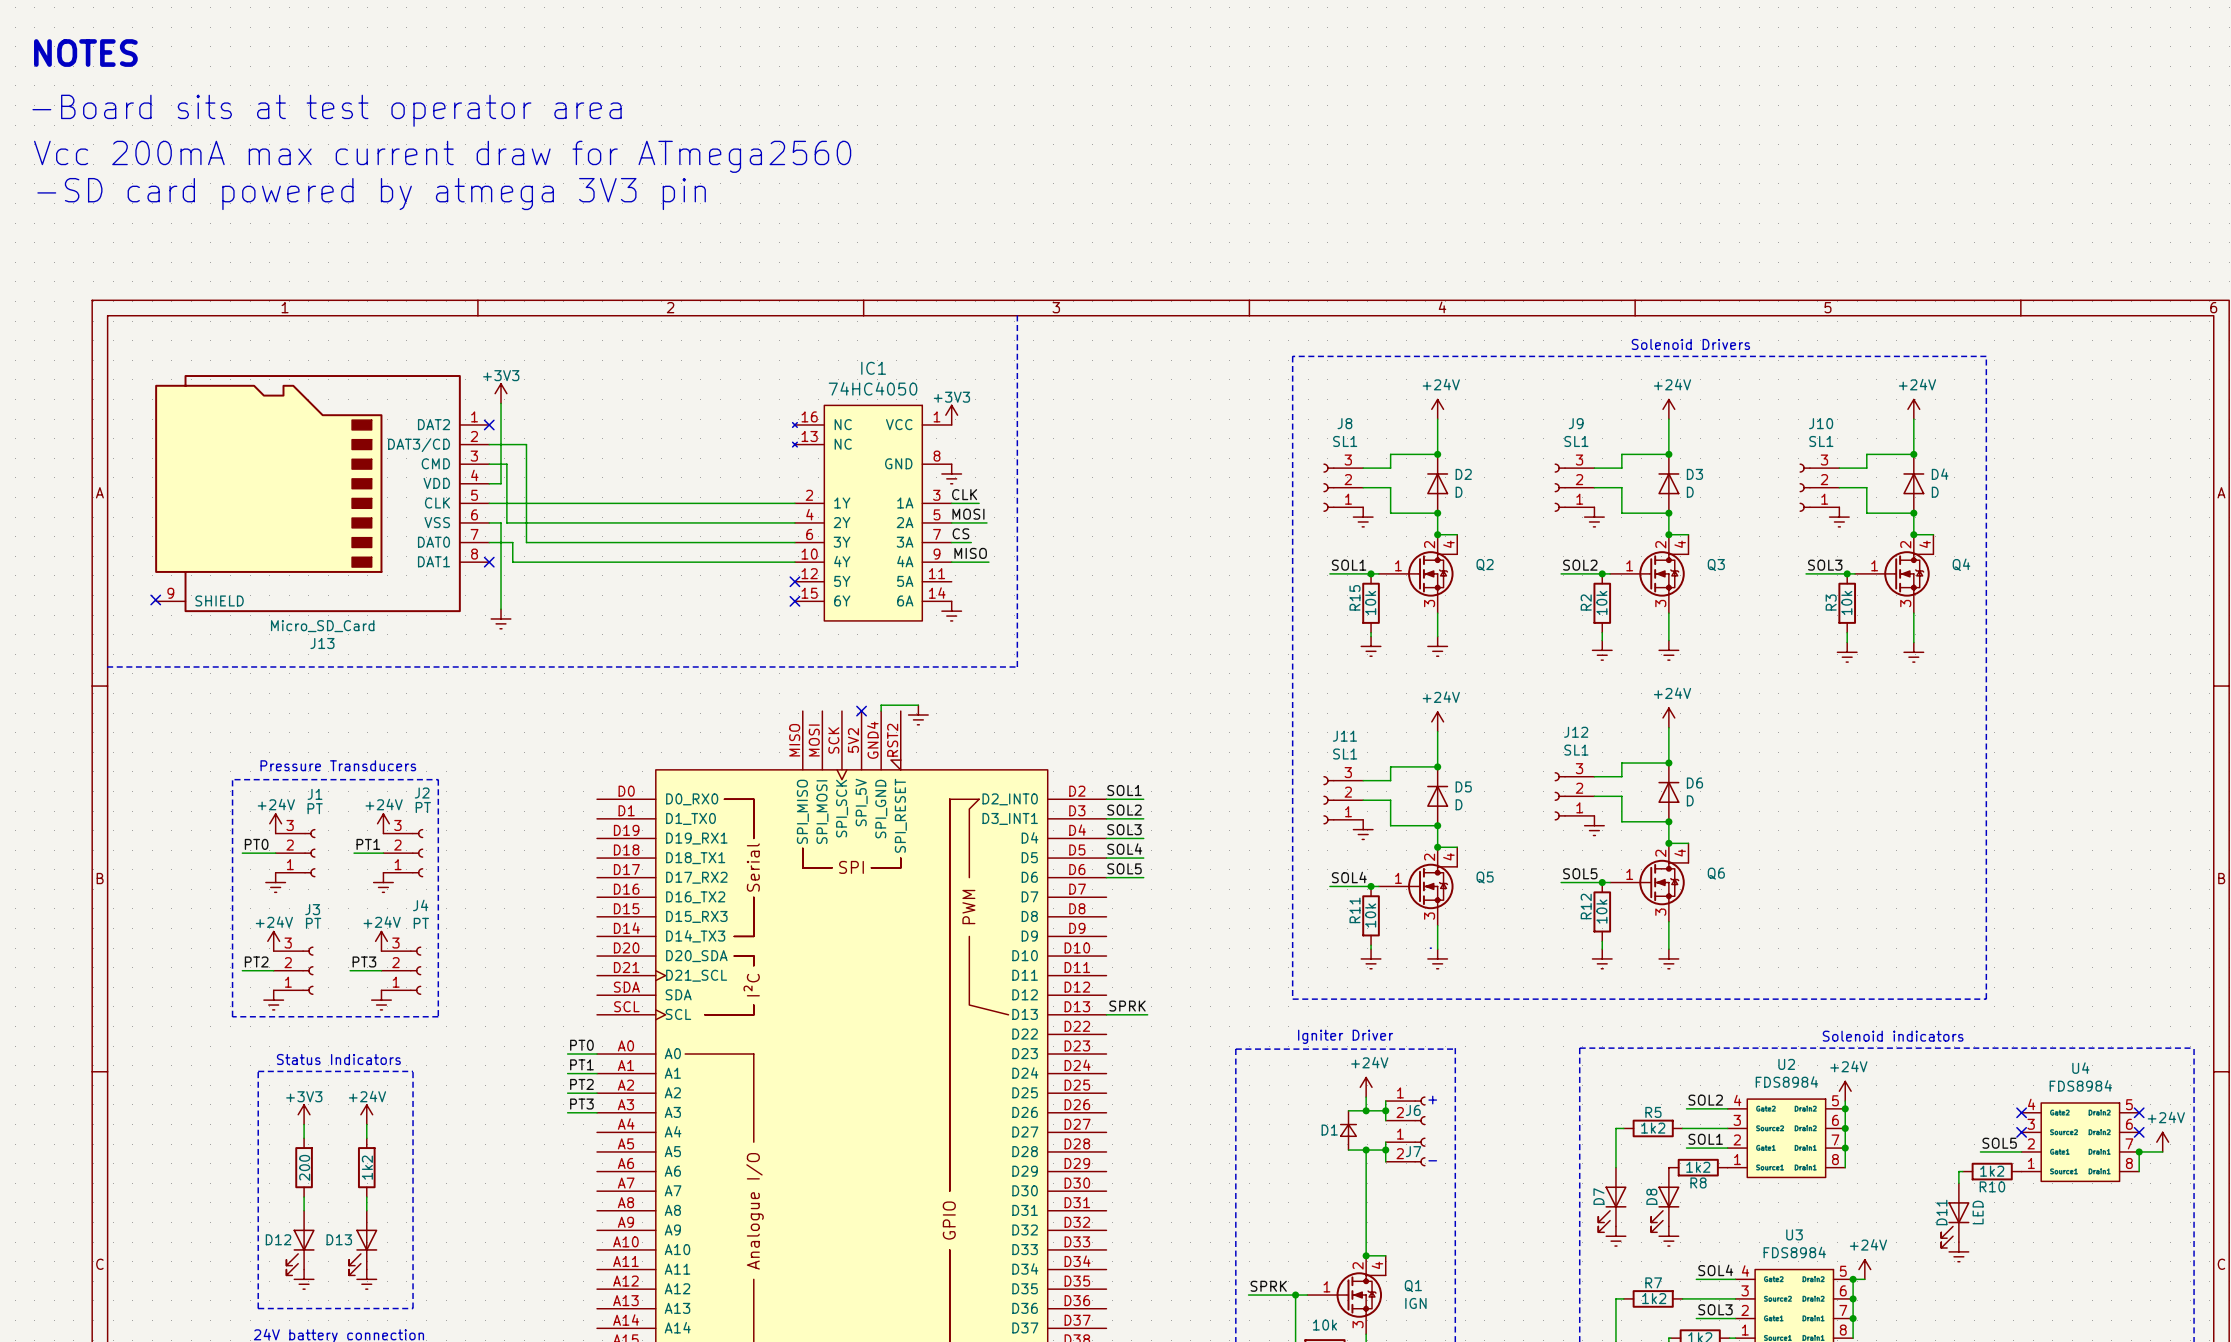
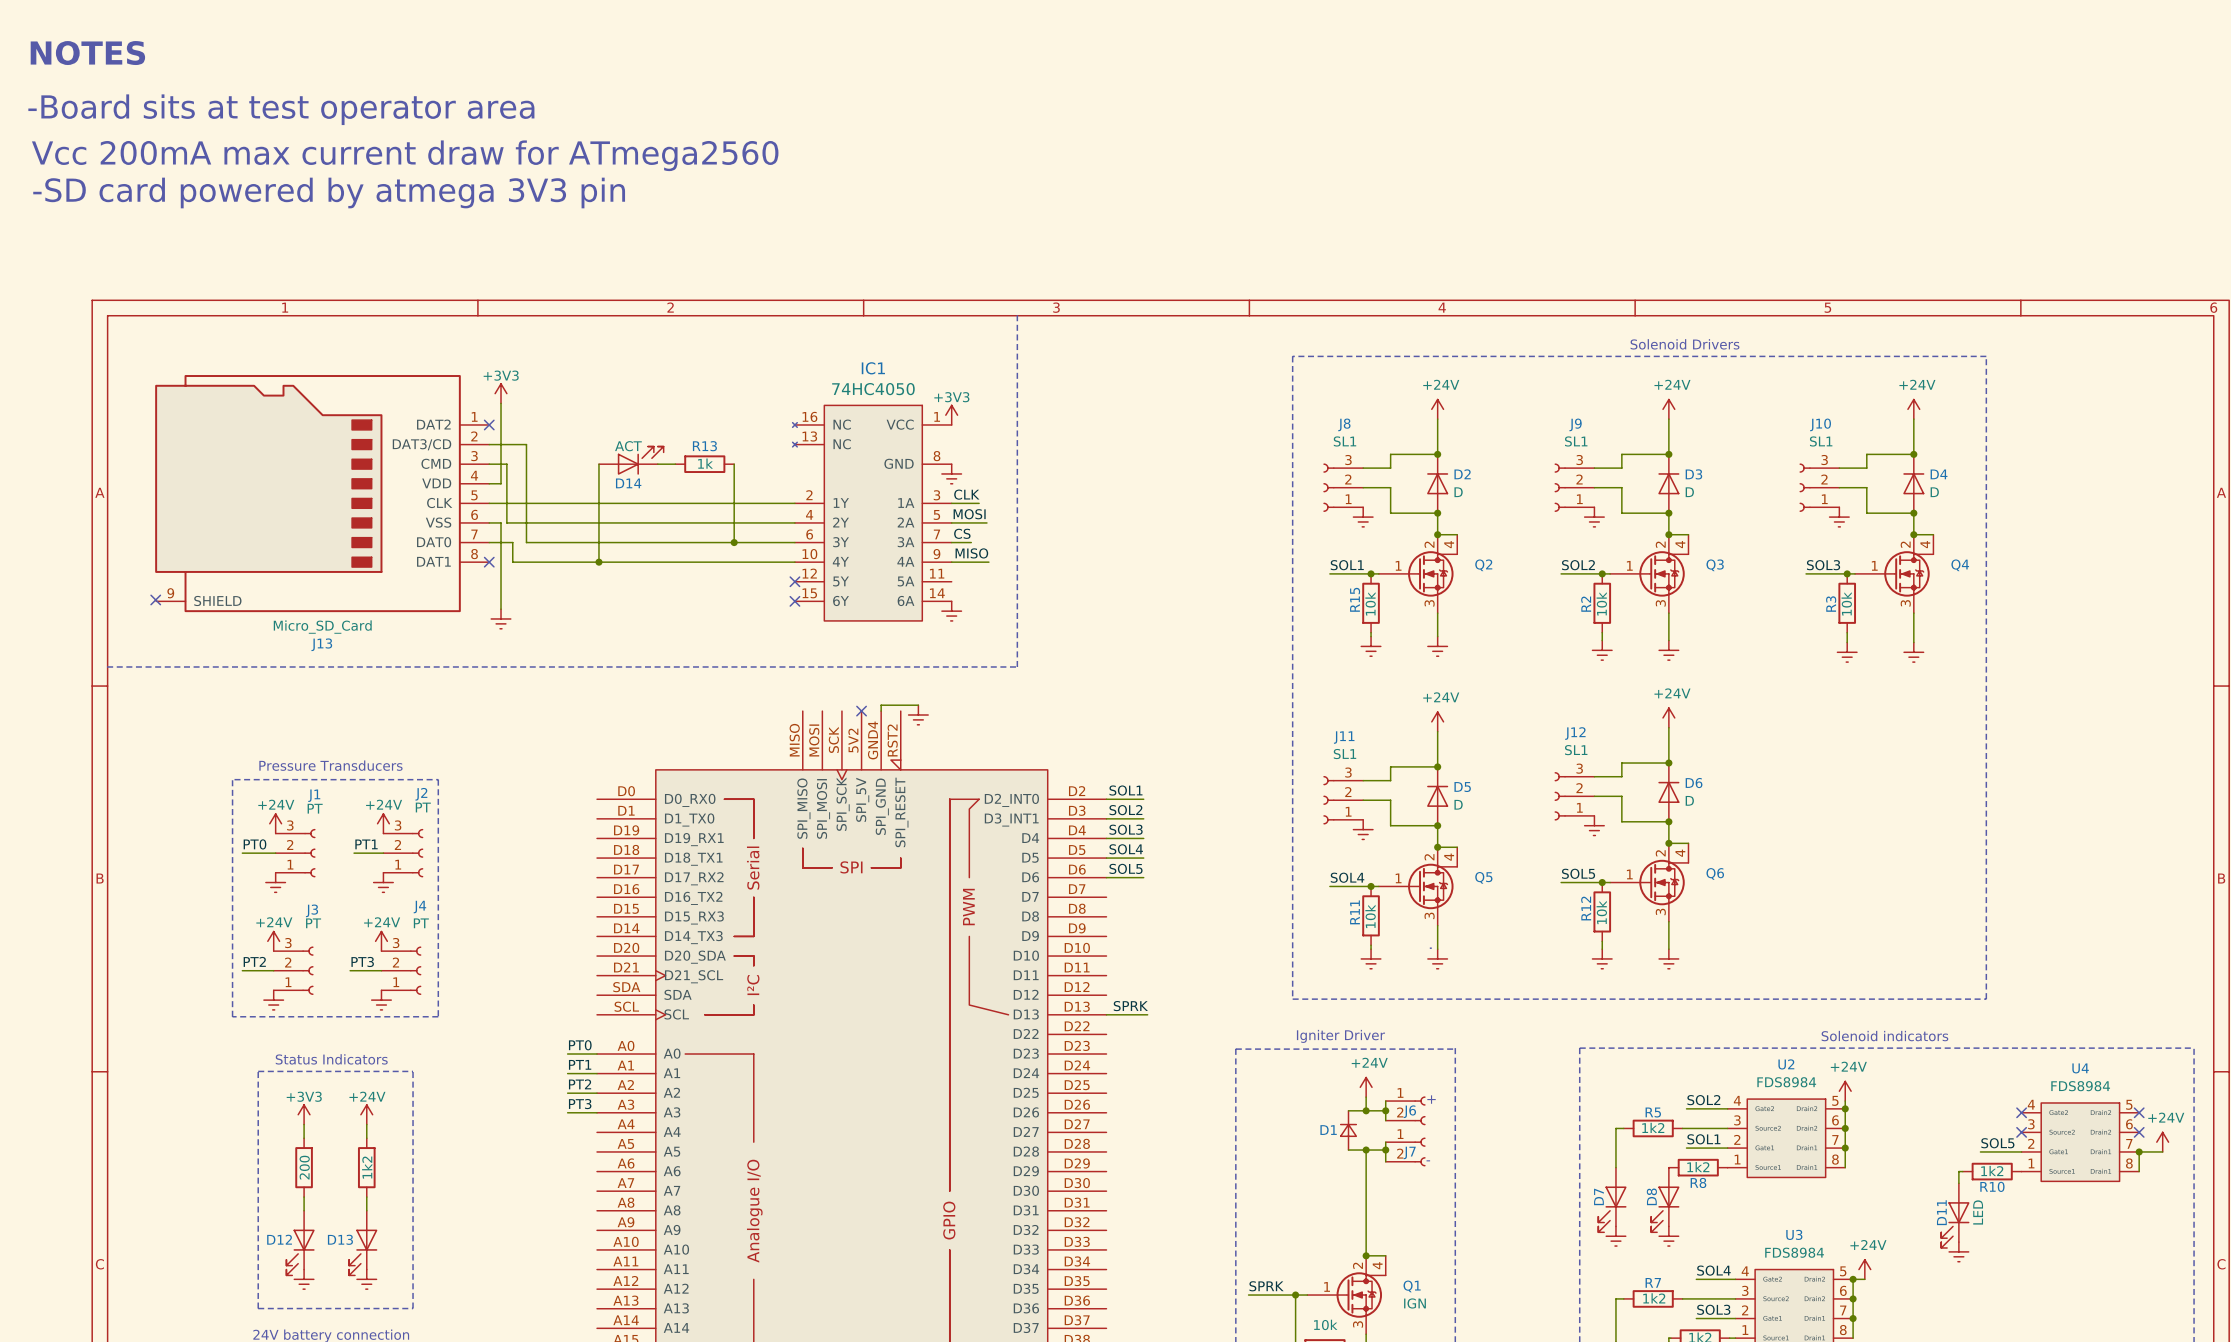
D14: none -> ACT (631, 460)
wire: none -> (598, 464) (598, 562)
wire: none -> (657, 464) (675, 464)
R13: none -> 1k (704, 464)
wire: none -> (734, 464) (734, 542)
junction: none -> (734, 542)
junction: none -> (598, 562)

